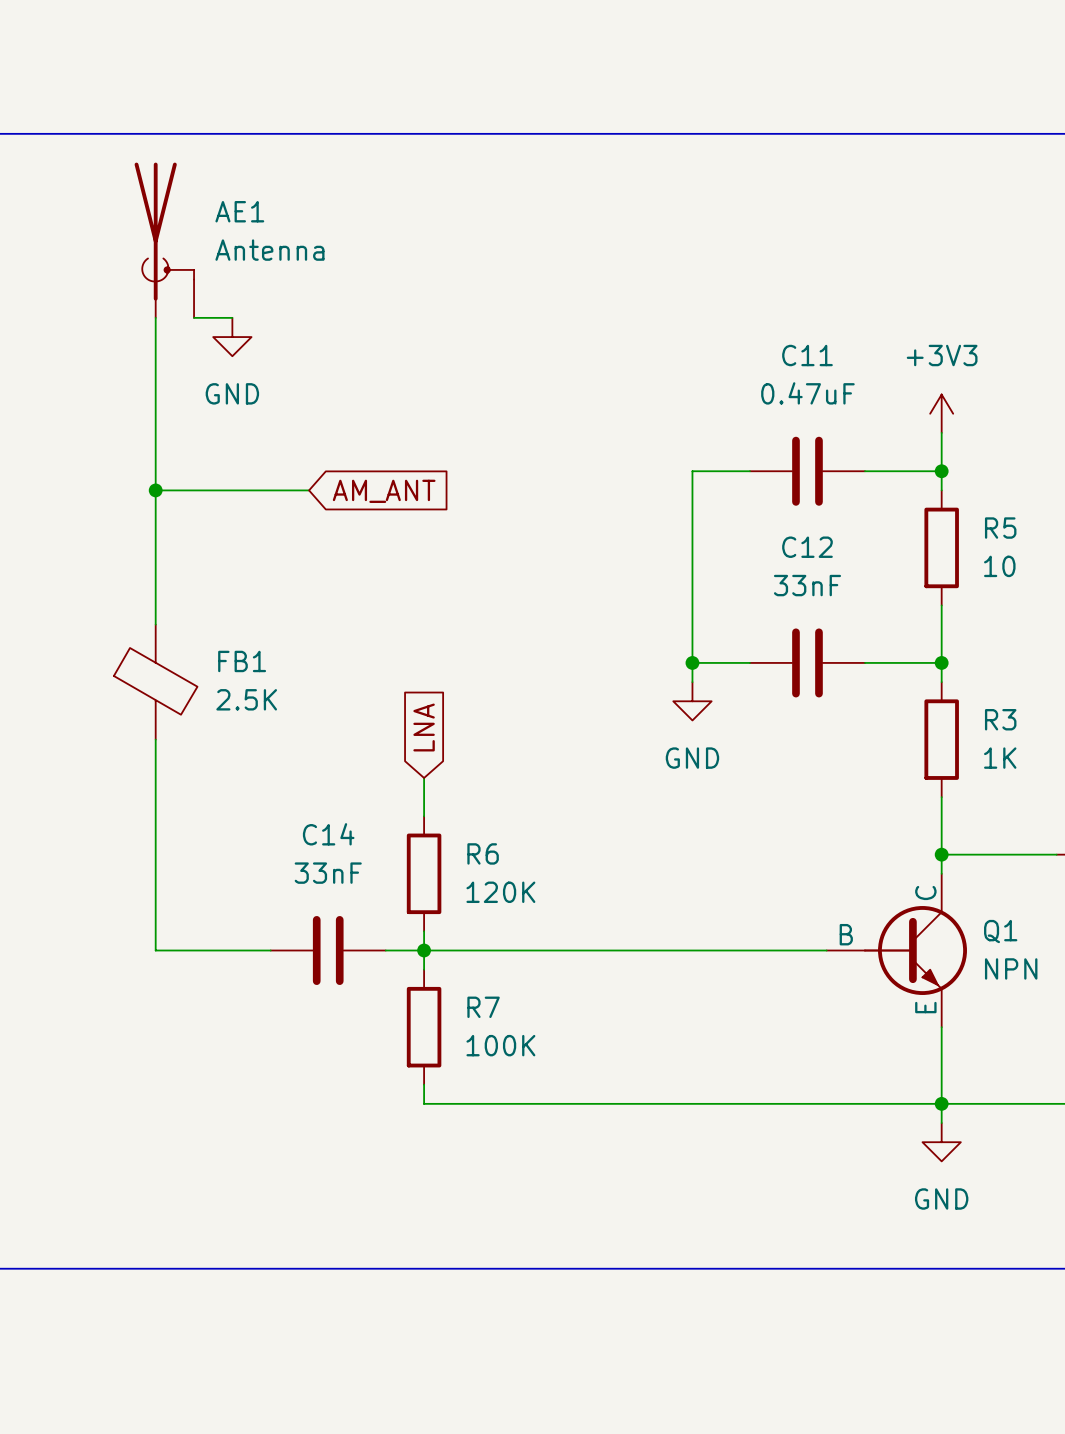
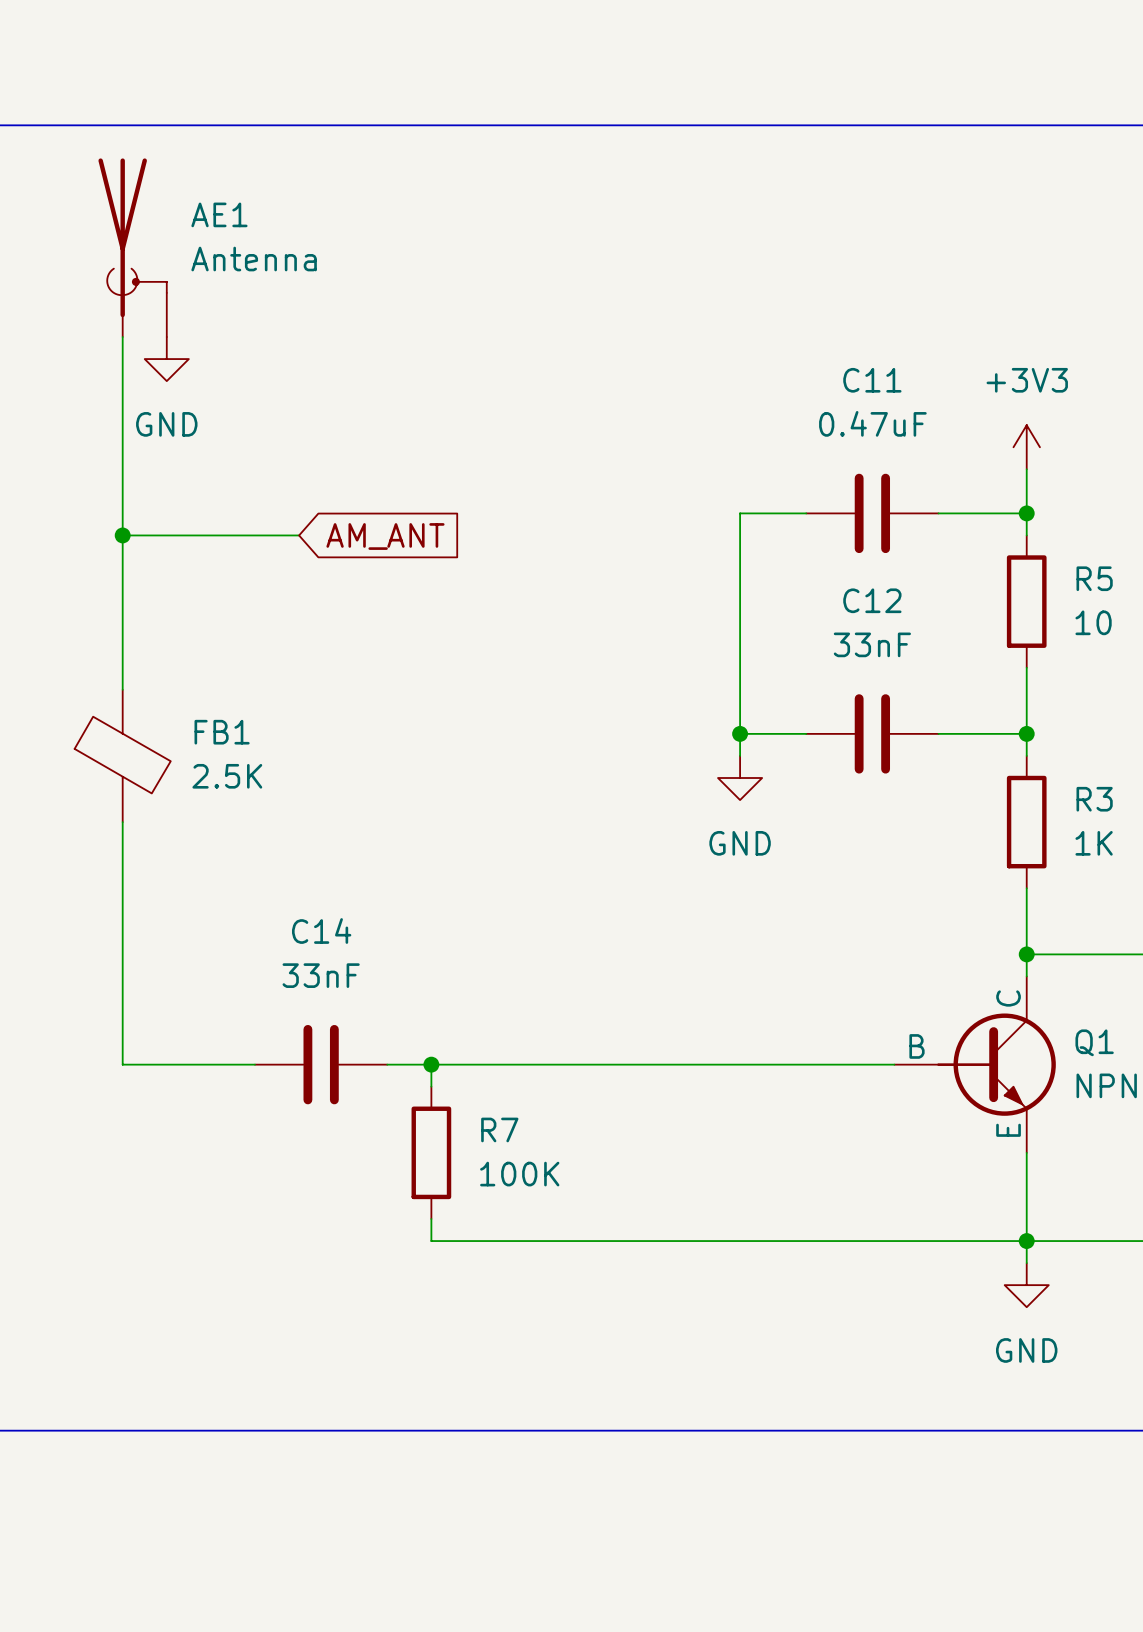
wire: (194, 317) (232, 317) -> none
power symbol position: GND (232, 337) -> GND (166, 359)
global label: LNA (424, 727) -> none
wire: (424, 777) (424, 816) -> none
R6: 120K (424, 873) -> none
wire: (424, 931) (424, 950) -> none

